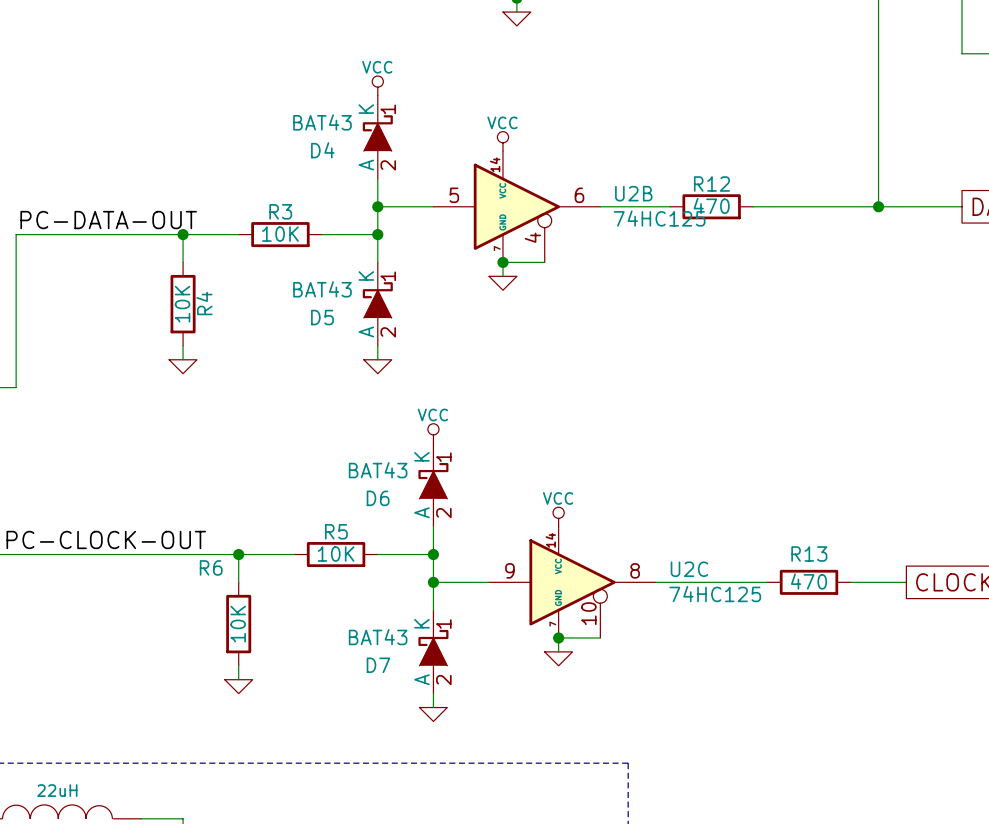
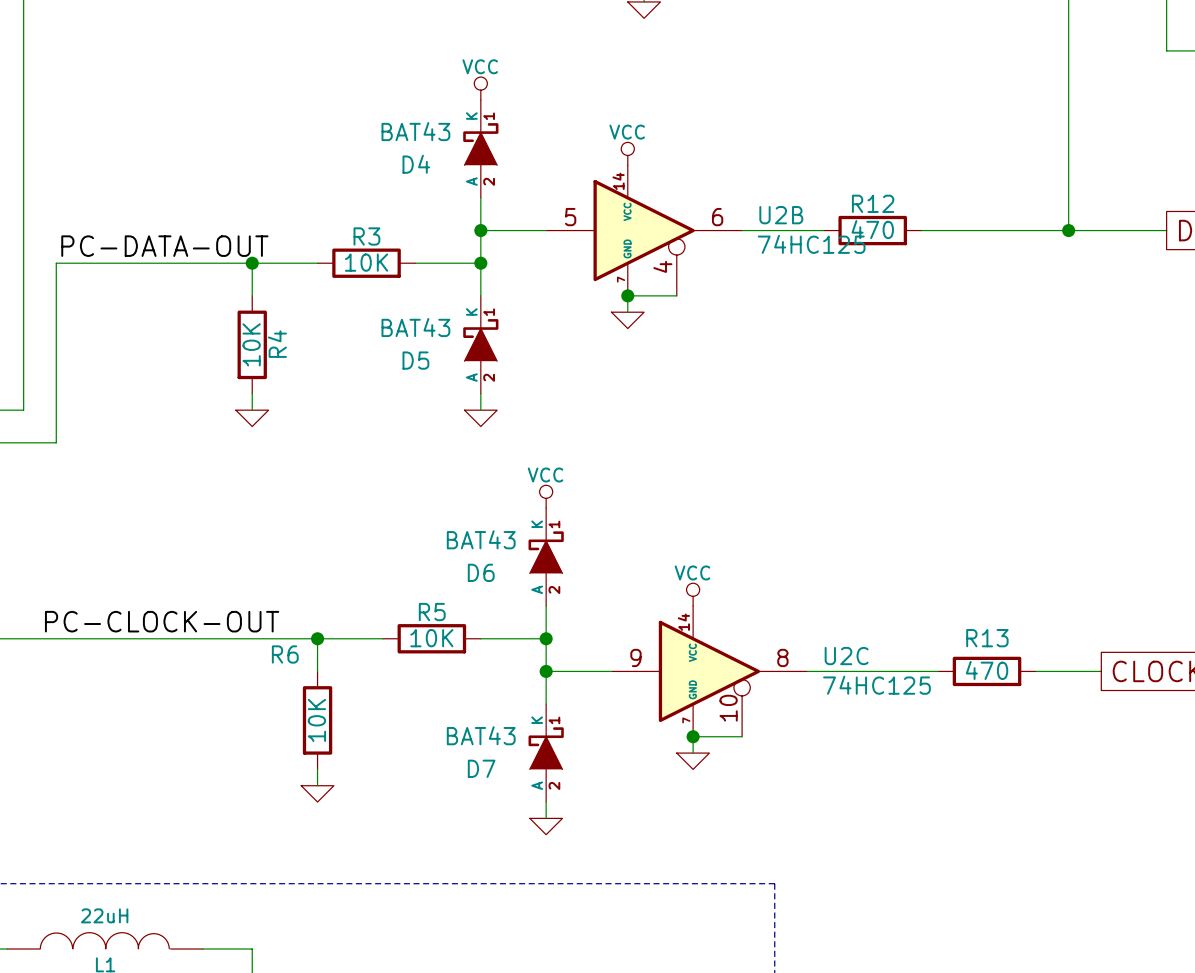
D4 symbol: [362, 95, 393, 179] -> [463, 99, 499, 198]
D5 symbol: [362, 262, 393, 346] -> [463, 295, 499, 394]
D6 symbol: [418, 443, 449, 527] -> [528, 508, 564, 607]
D7 symbol: [418, 610, 449, 694] -> [528, 704, 564, 803]

